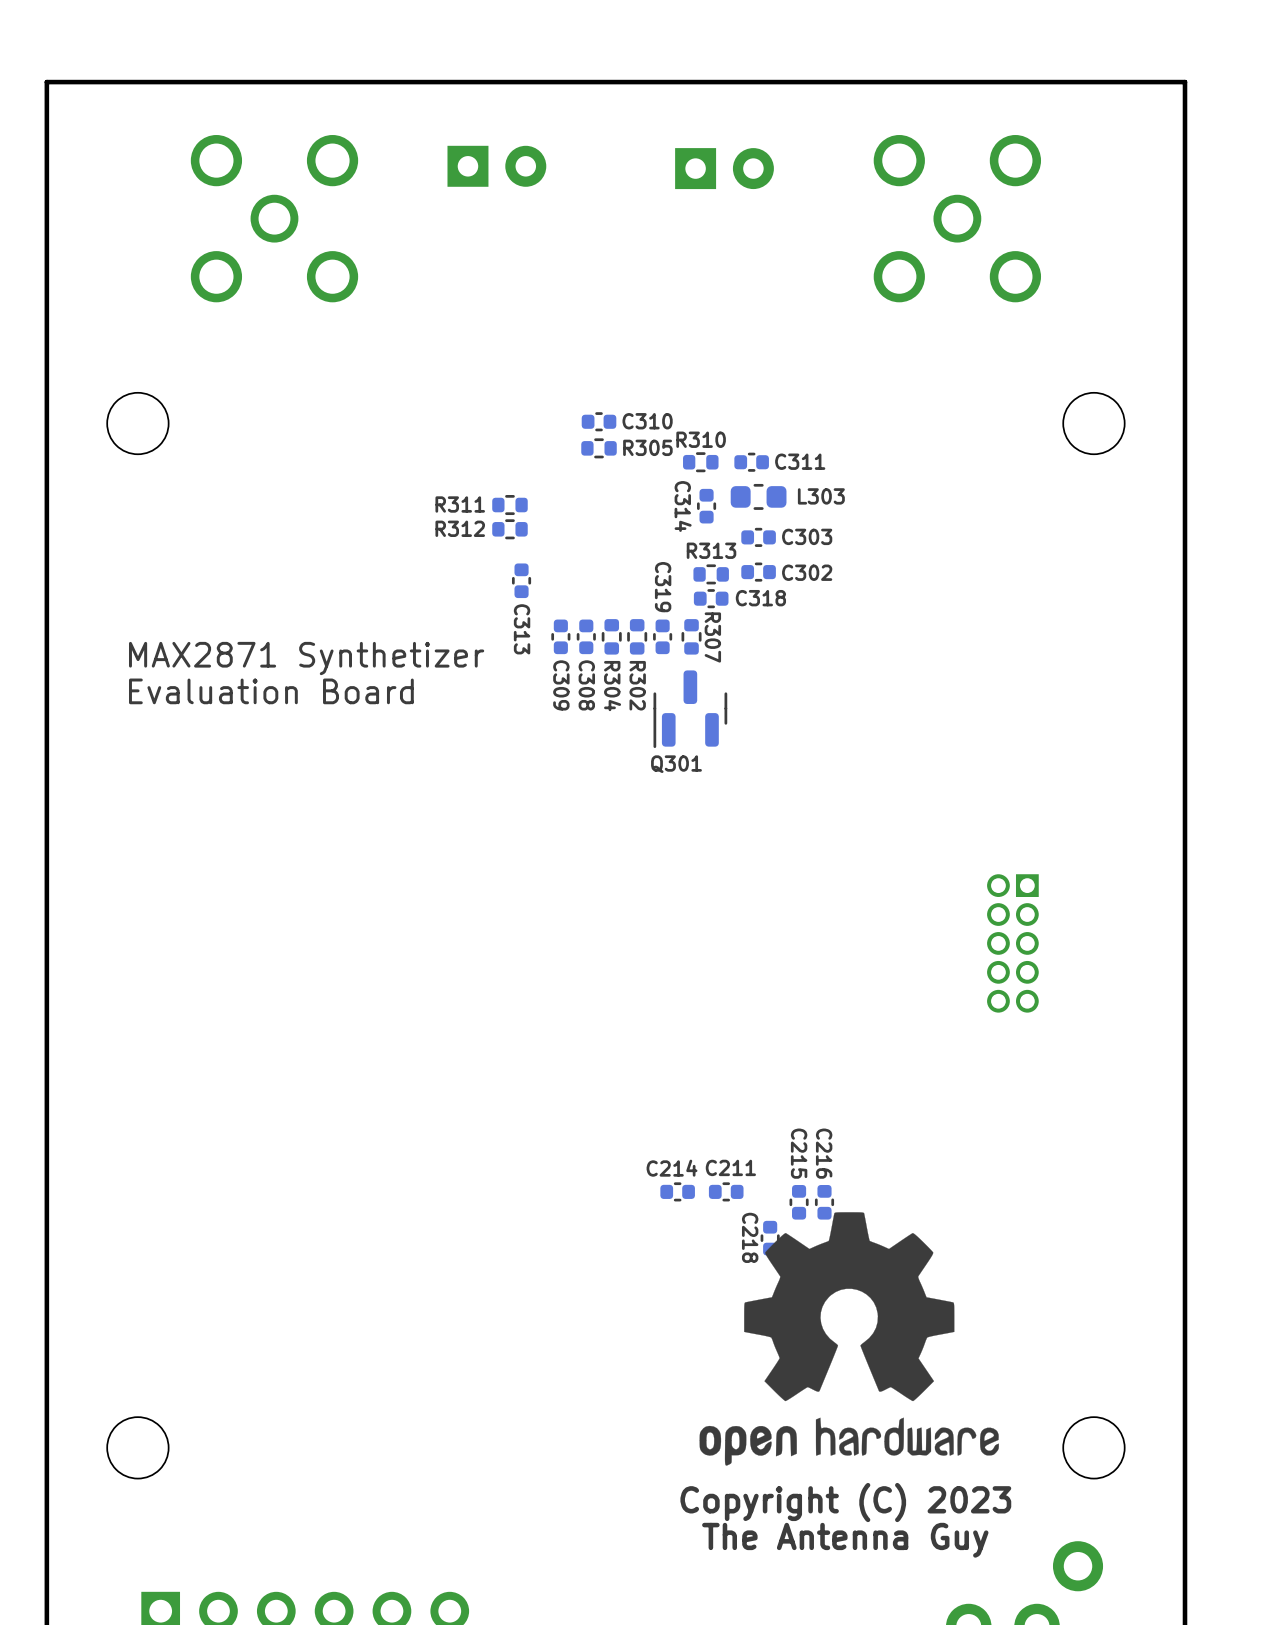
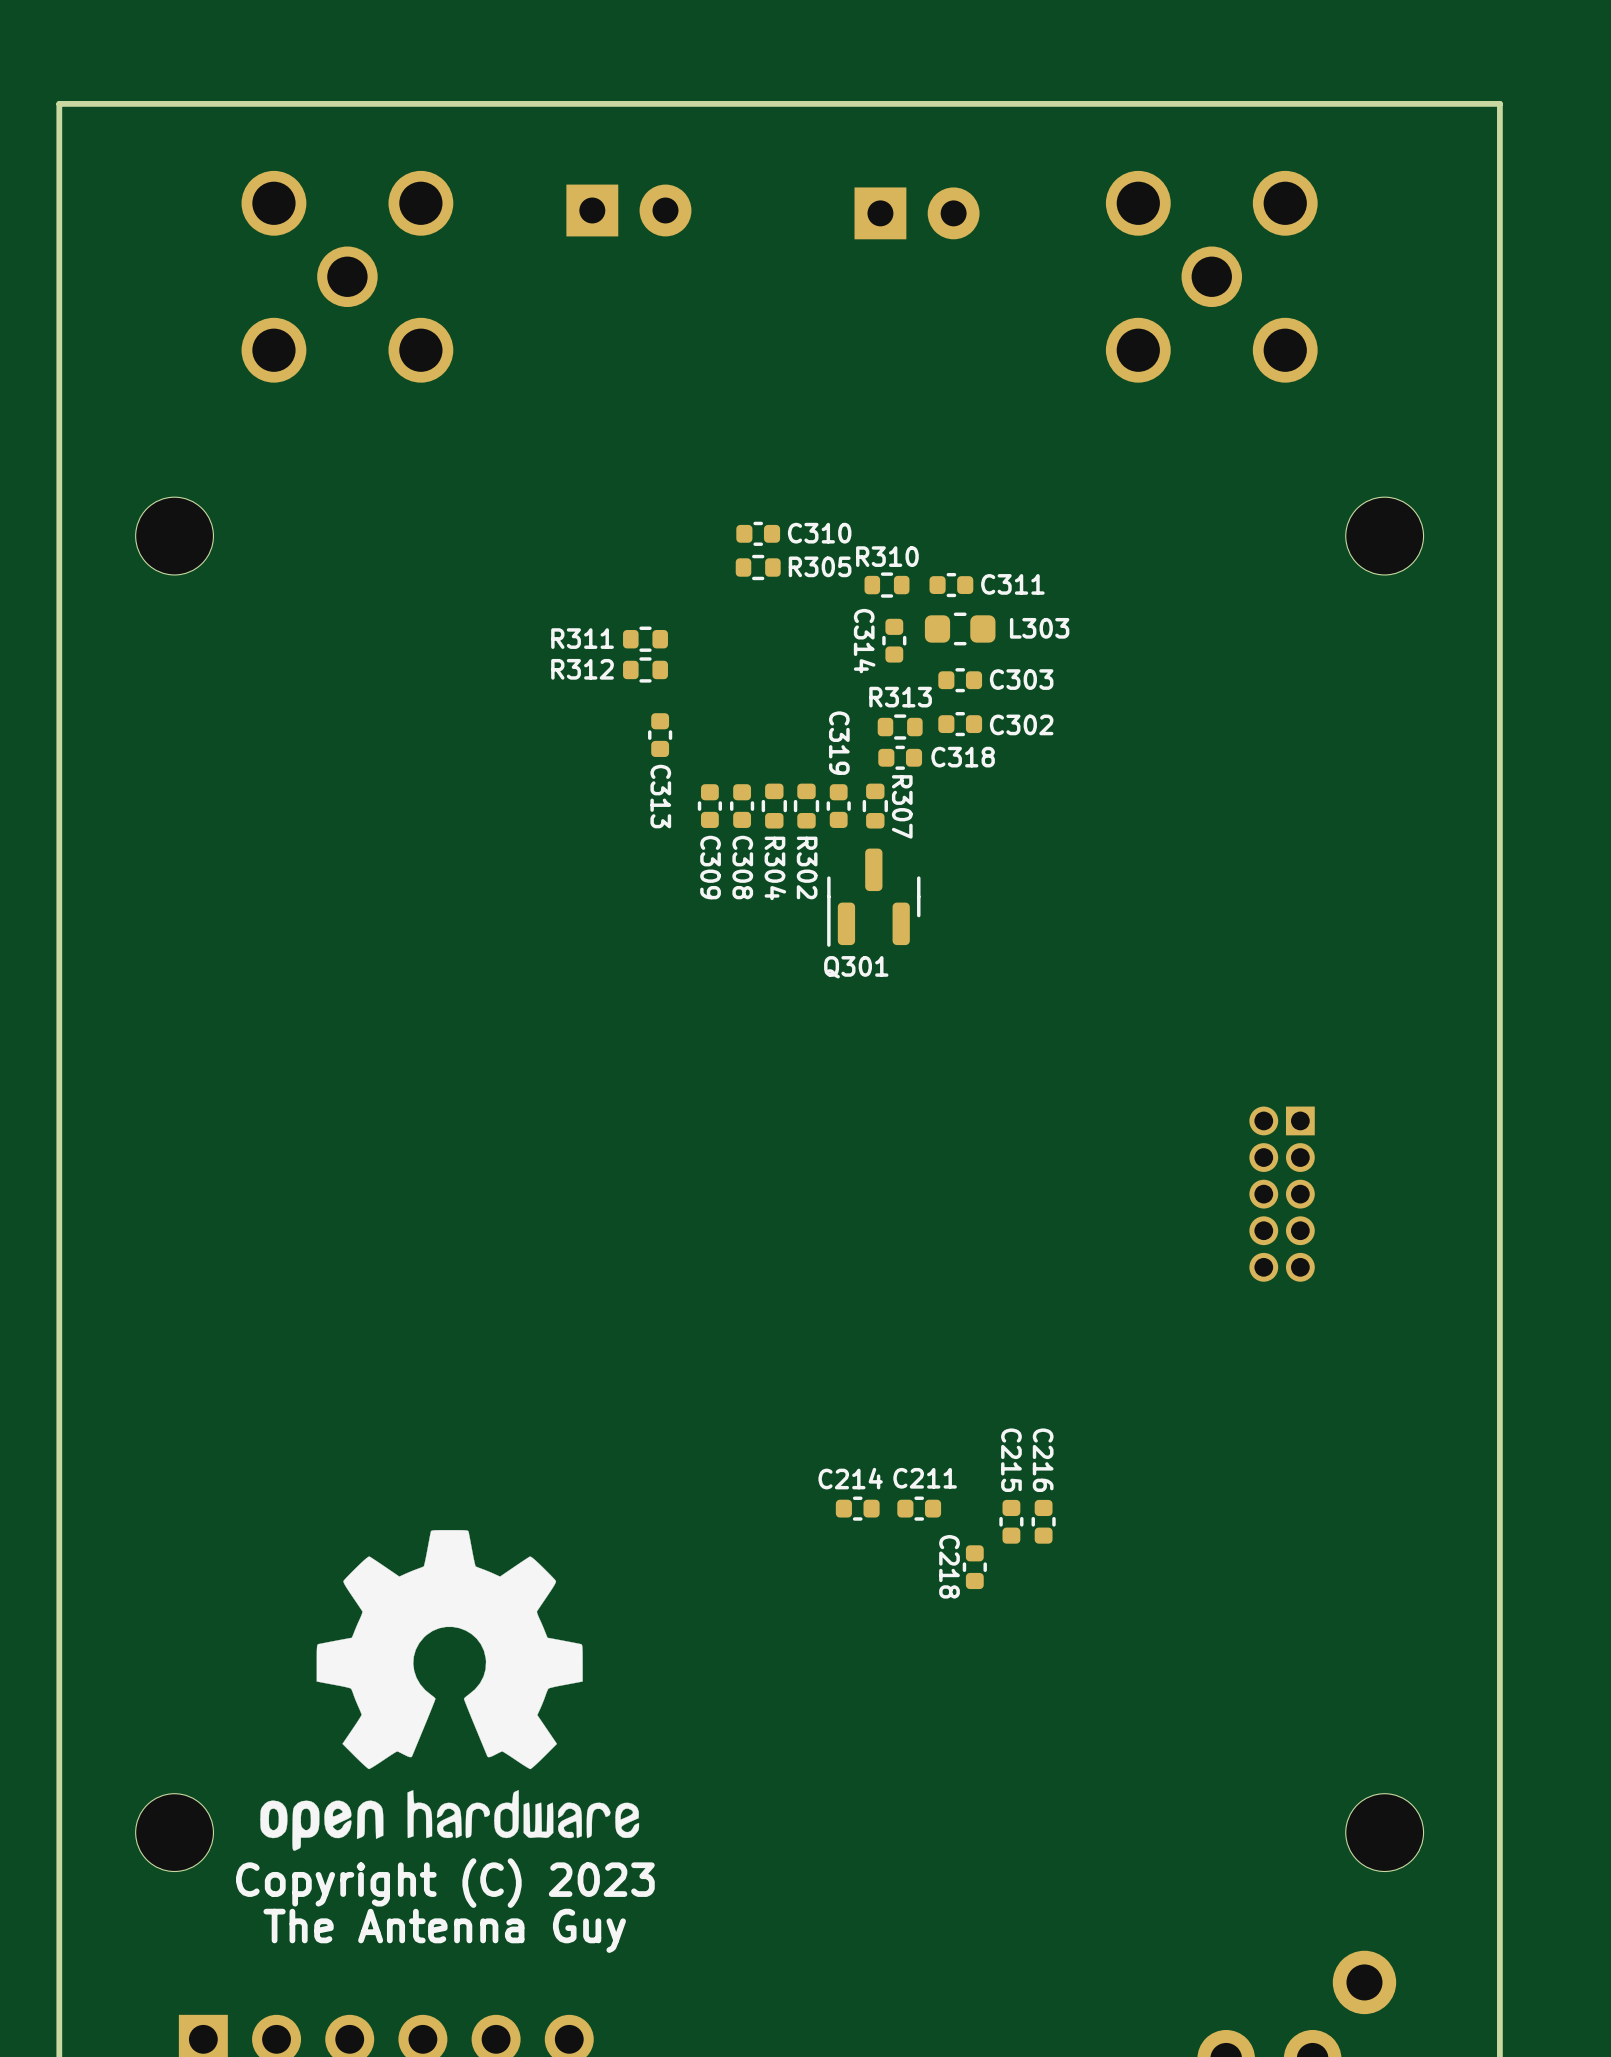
text: MAX2871 Synthetizer (306, 658) -> none
text: Evaluation Board (271, 691) -> none
drawing position: (849, 1338) -> (449, 1690)
text position: Copyright (C) 2023 (845, 1502) -> Copyright (C) 2023 (445, 1883)
text position: The Antenna Guy (845, 1540) -> The Antenna Guy (444, 1930)

